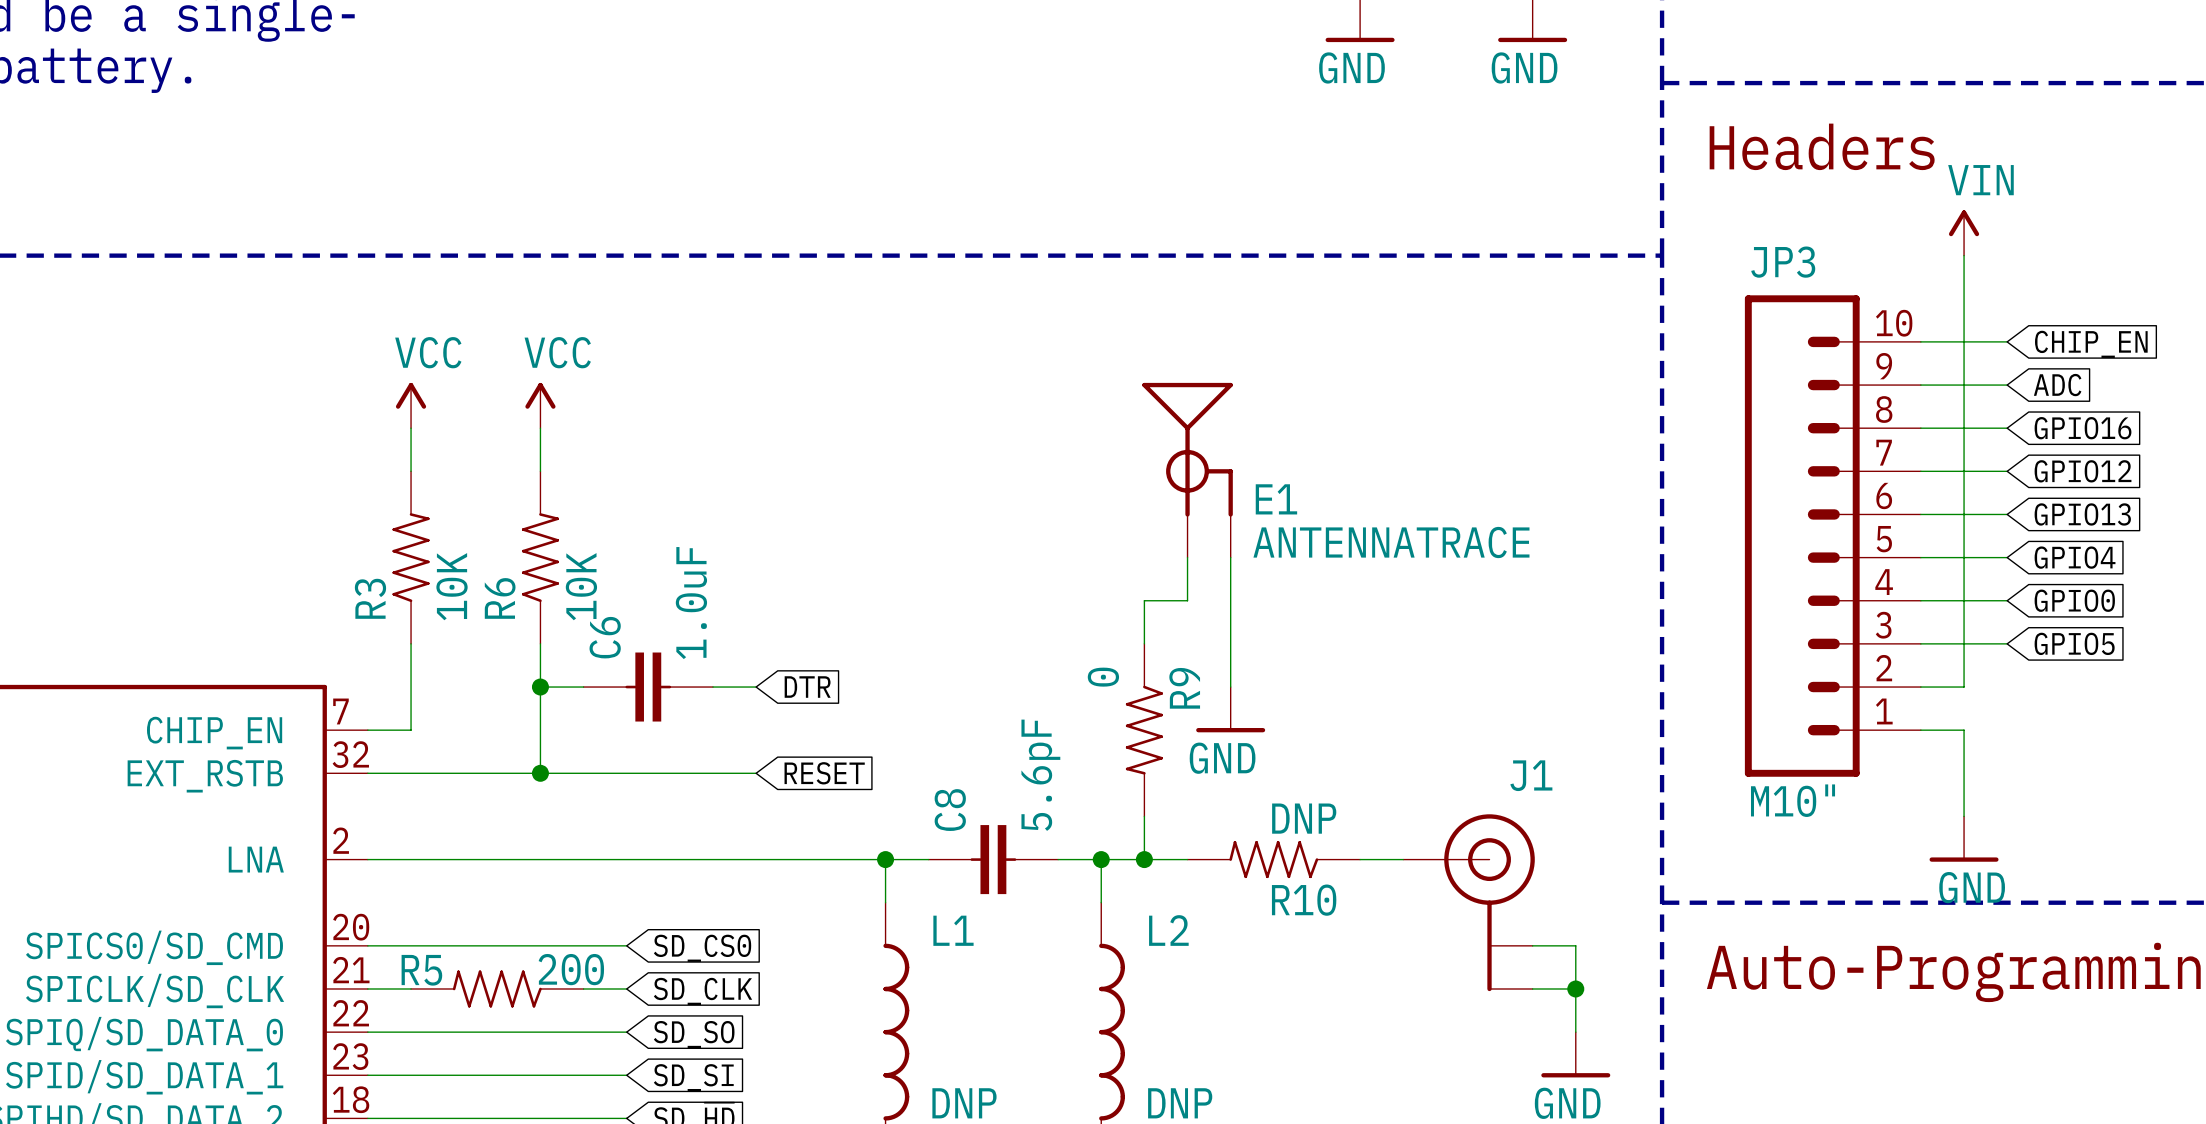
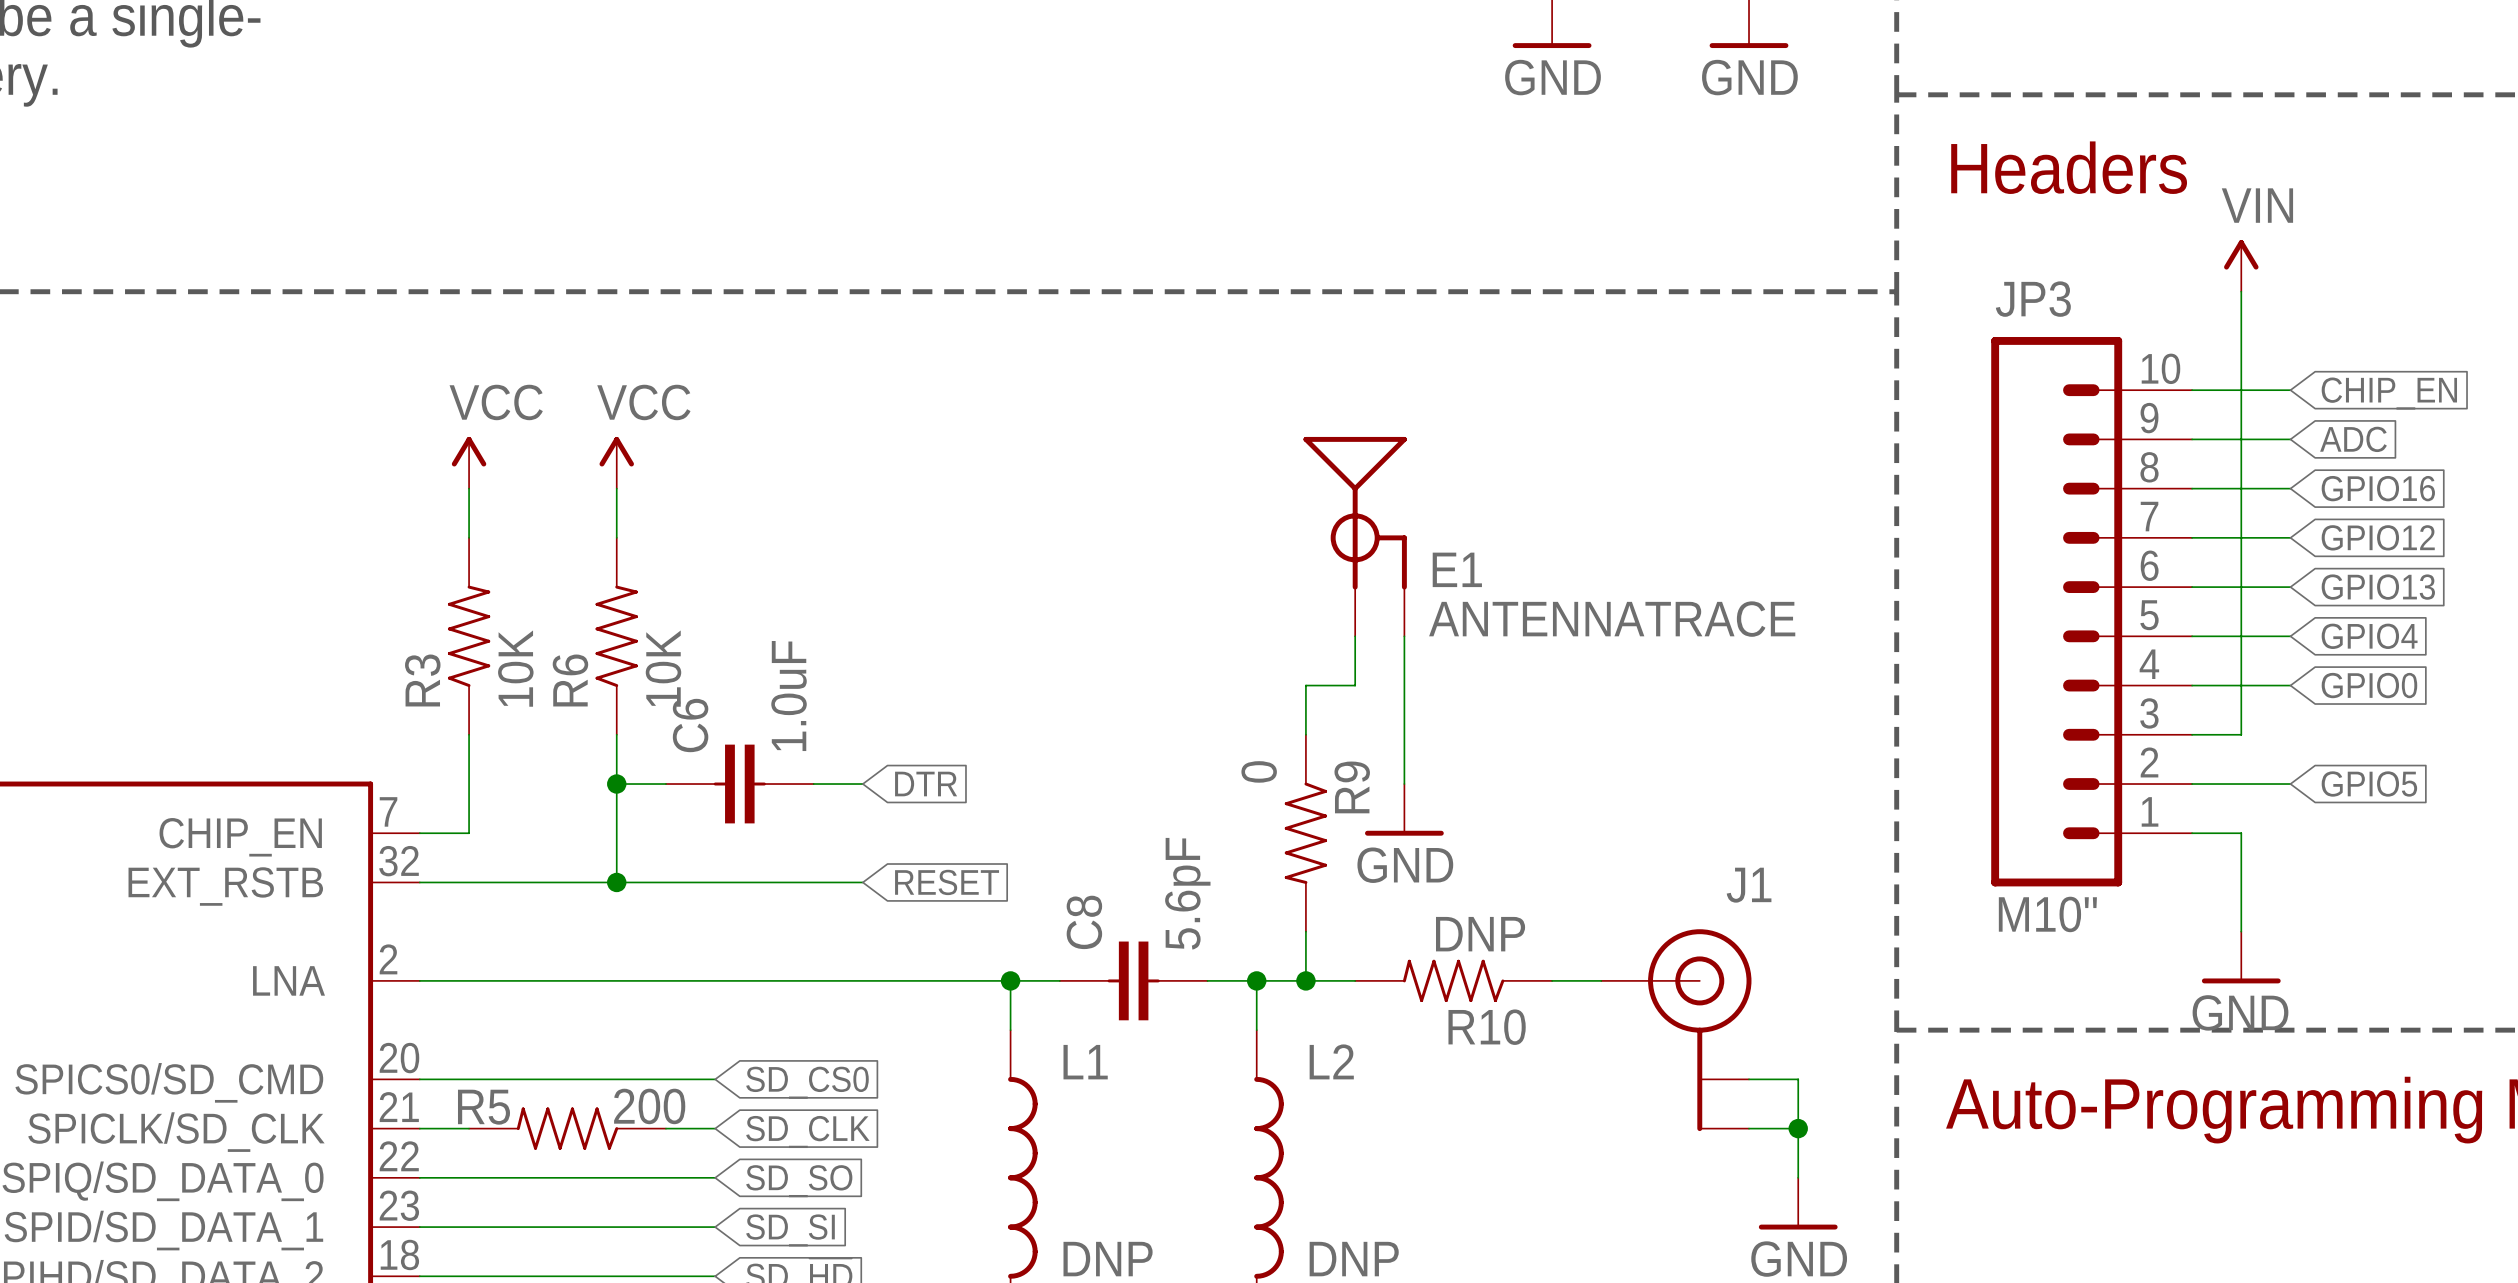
wire: (2007, 643) (1964, 643) (1964, 687) -> (2290, 784) (2241, 784)
global label position: GPIO5 (2074, 643) -> GPIO5 (2369, 784)

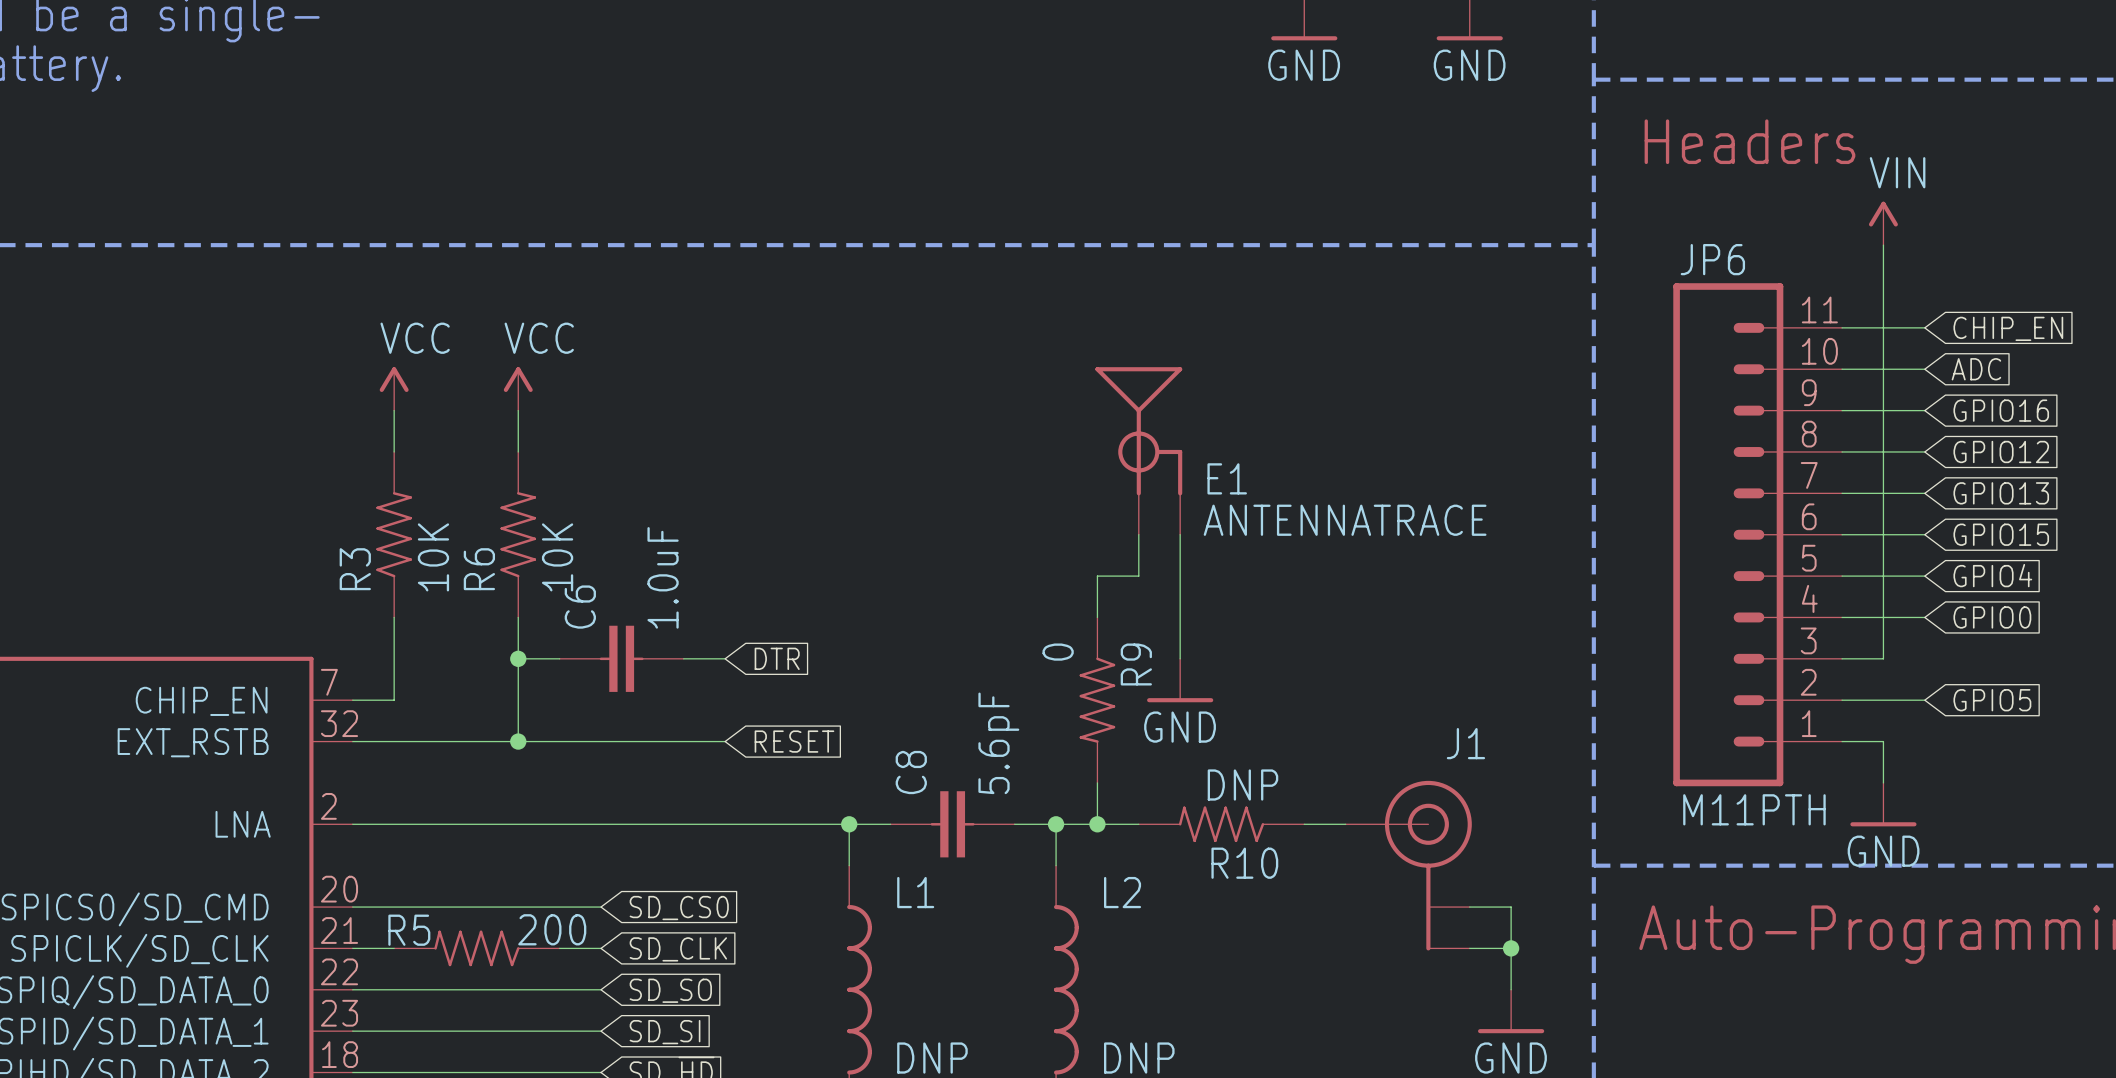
JP3: M10" (2091, 611) -> none
JP6: none -> M11PTH (1757, 534)
global label: GPIO4 (2369, 636) -> GPIO15 (2001, 534)
global label: GPIO0 (2369, 685) -> GPIO4 (1992, 575)
global label: none -> GPIO0 (1992, 617)
wire: (2241, 784) (2290, 784) -> (1883, 658) (1883, 617) (1924, 617)
global label position: GPIO5 (2369, 784) -> GPIO5 (1992, 700)
wire: (2241, 833) (2241, 882) -> (1883, 700) (1924, 700)
wire: none -> (1842, 741) (1883, 741)

